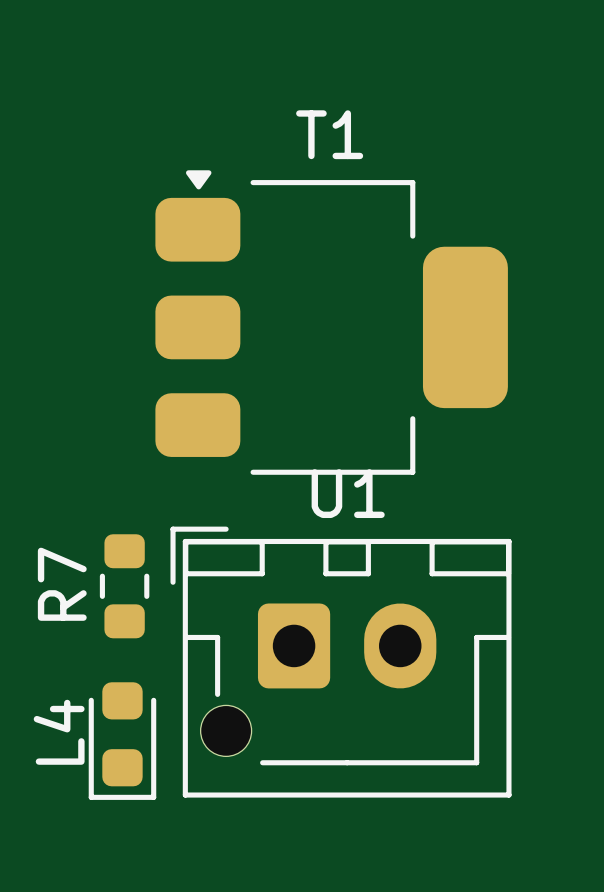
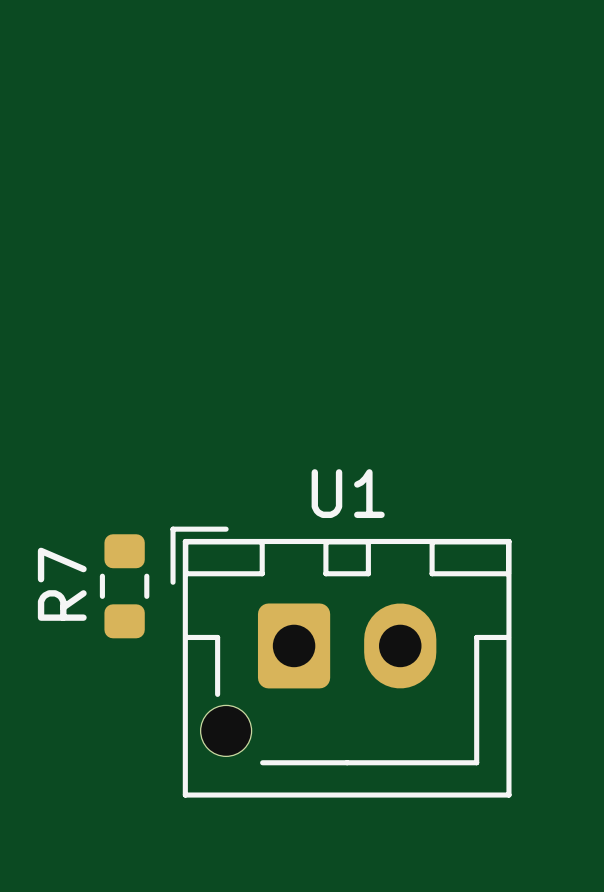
T1: (331, 322) -> none
L4: (122, 741) -> none

